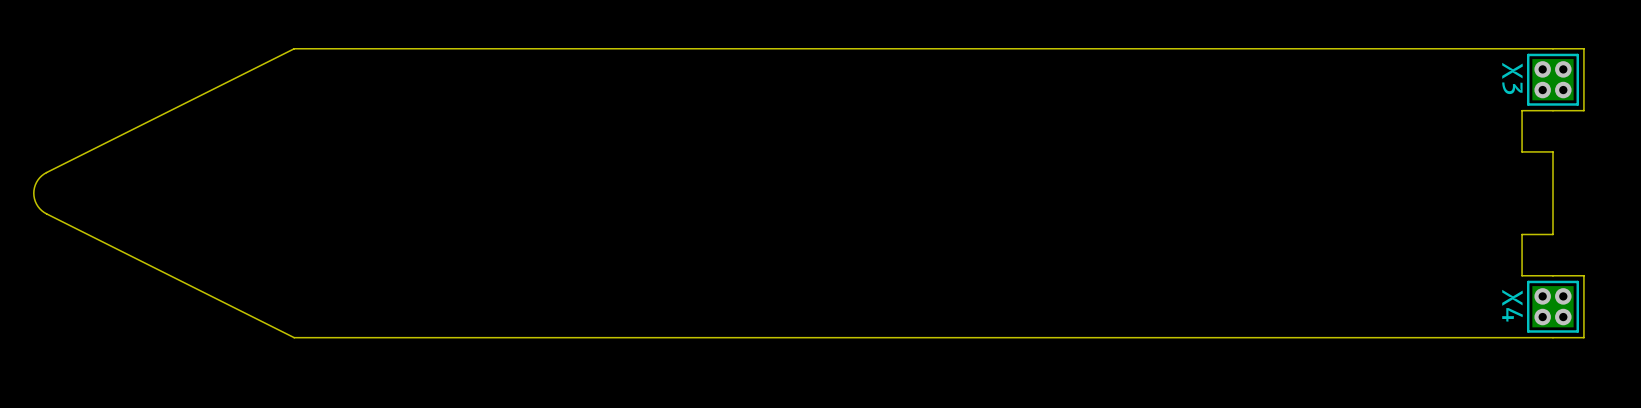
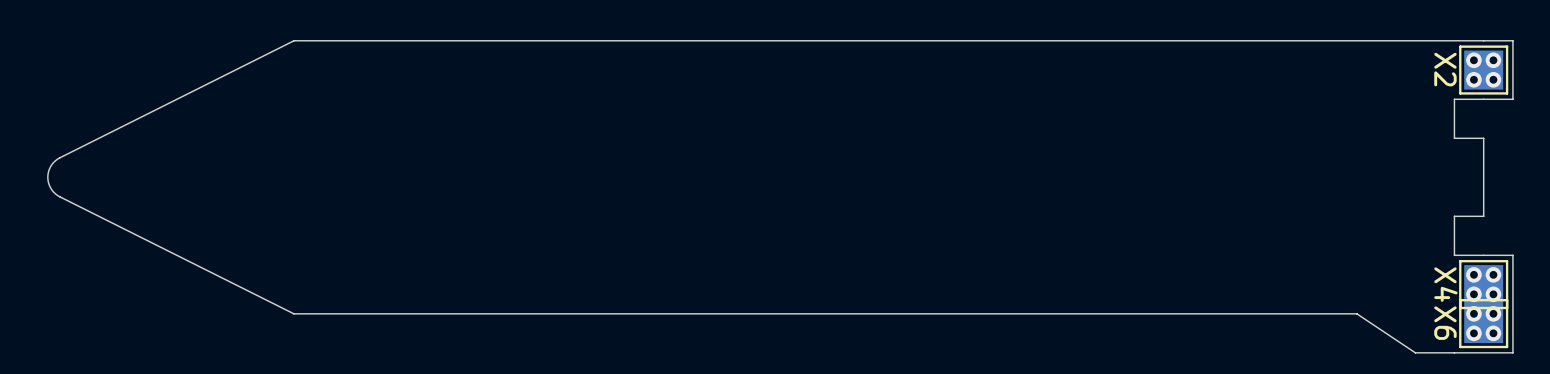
X3 name: X3 (1512, 78) -> X2 (1445, 69)
via: none -> (1473, 313)
via: none -> (1493, 313)
board edge: (1583, 337) (1418, 337) -> (1512, 313) (1512, 352) (1415, 352) (1356, 313)
X6: none -> (1483, 323)
via: none -> (1473, 333)
via: none -> (1493, 333)

